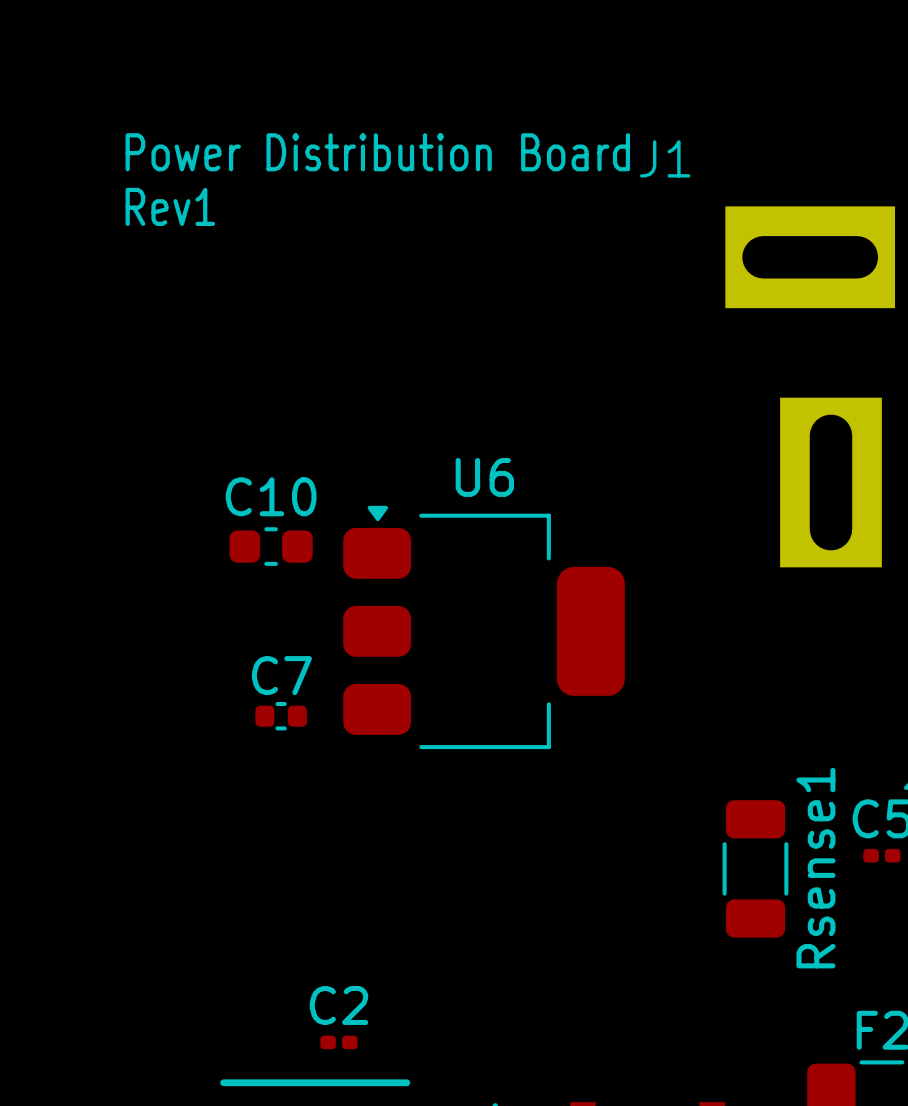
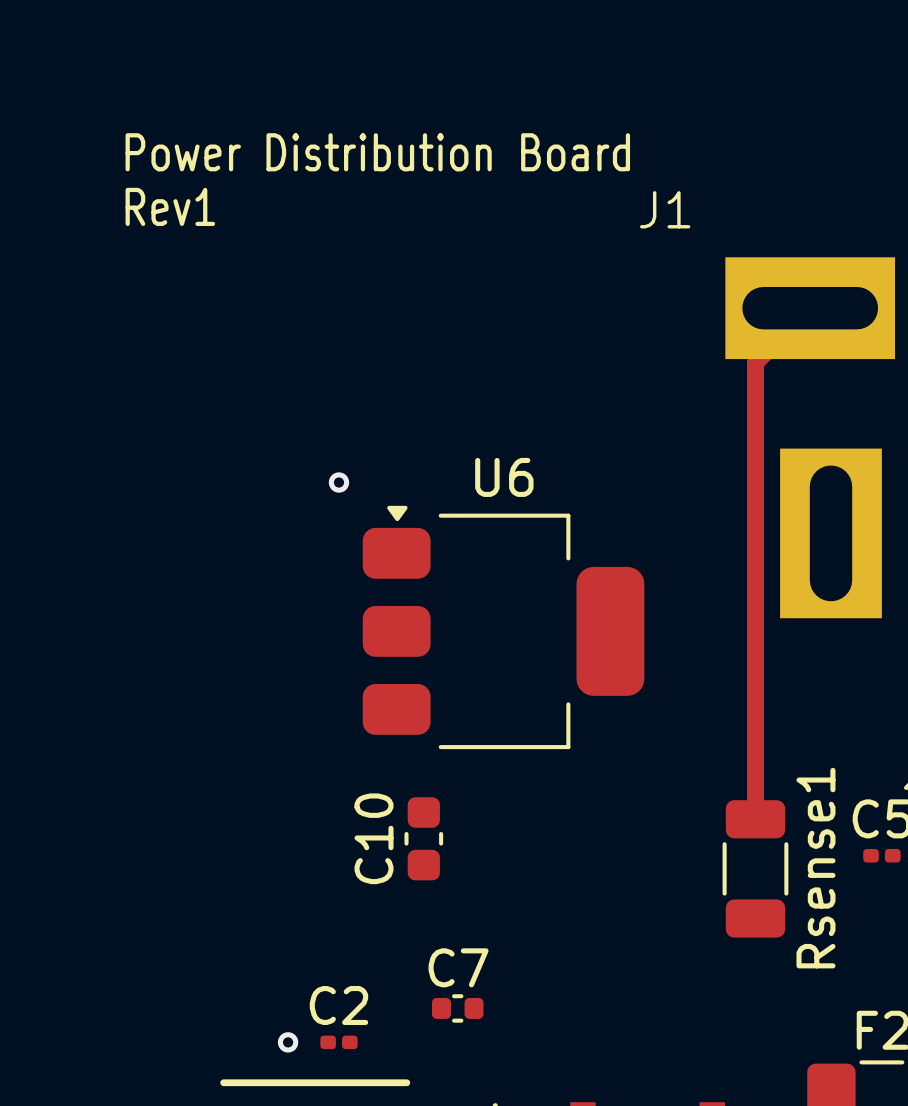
track: none -> (810, 308) (755, 362) (755, 819)
J1 position: (810, 386) -> (810, 437)
via: none -> (338, 482)
C10 name position: C10 (271, 496) -> C10 (374, 838)
C10 rotation: 0° (271, 546) -> 90° clockwise (423, 838)
C10 position: (271, 546) -> (423, 838)
U6 position: (484, 627) -> (503, 627)
C7 position: (281, 716) -> (457, 1008)
via: none -> (288, 1042)

